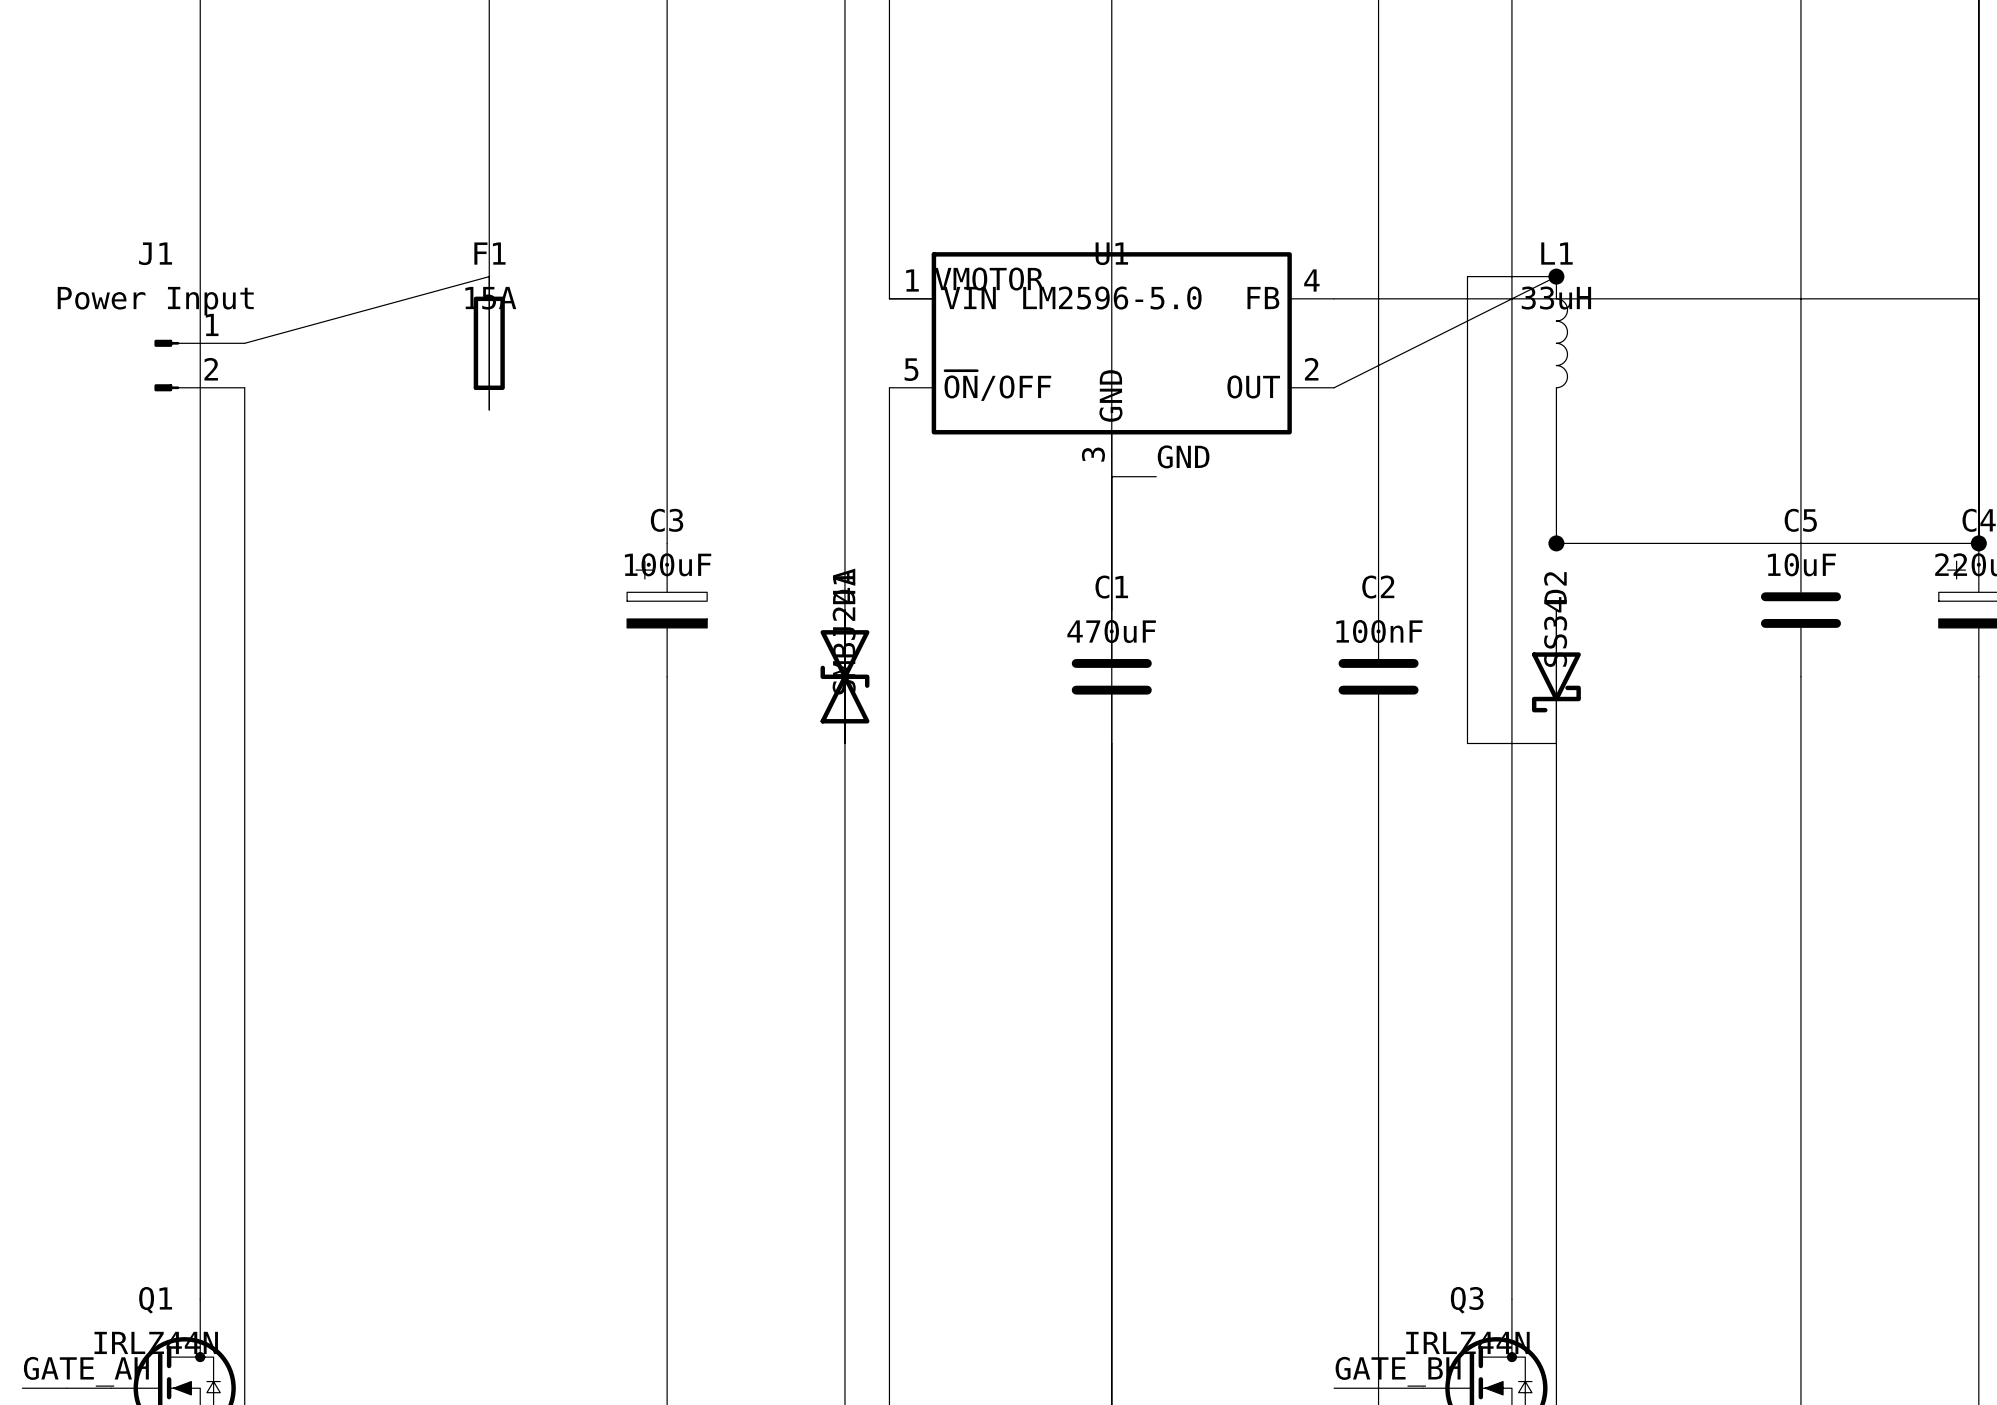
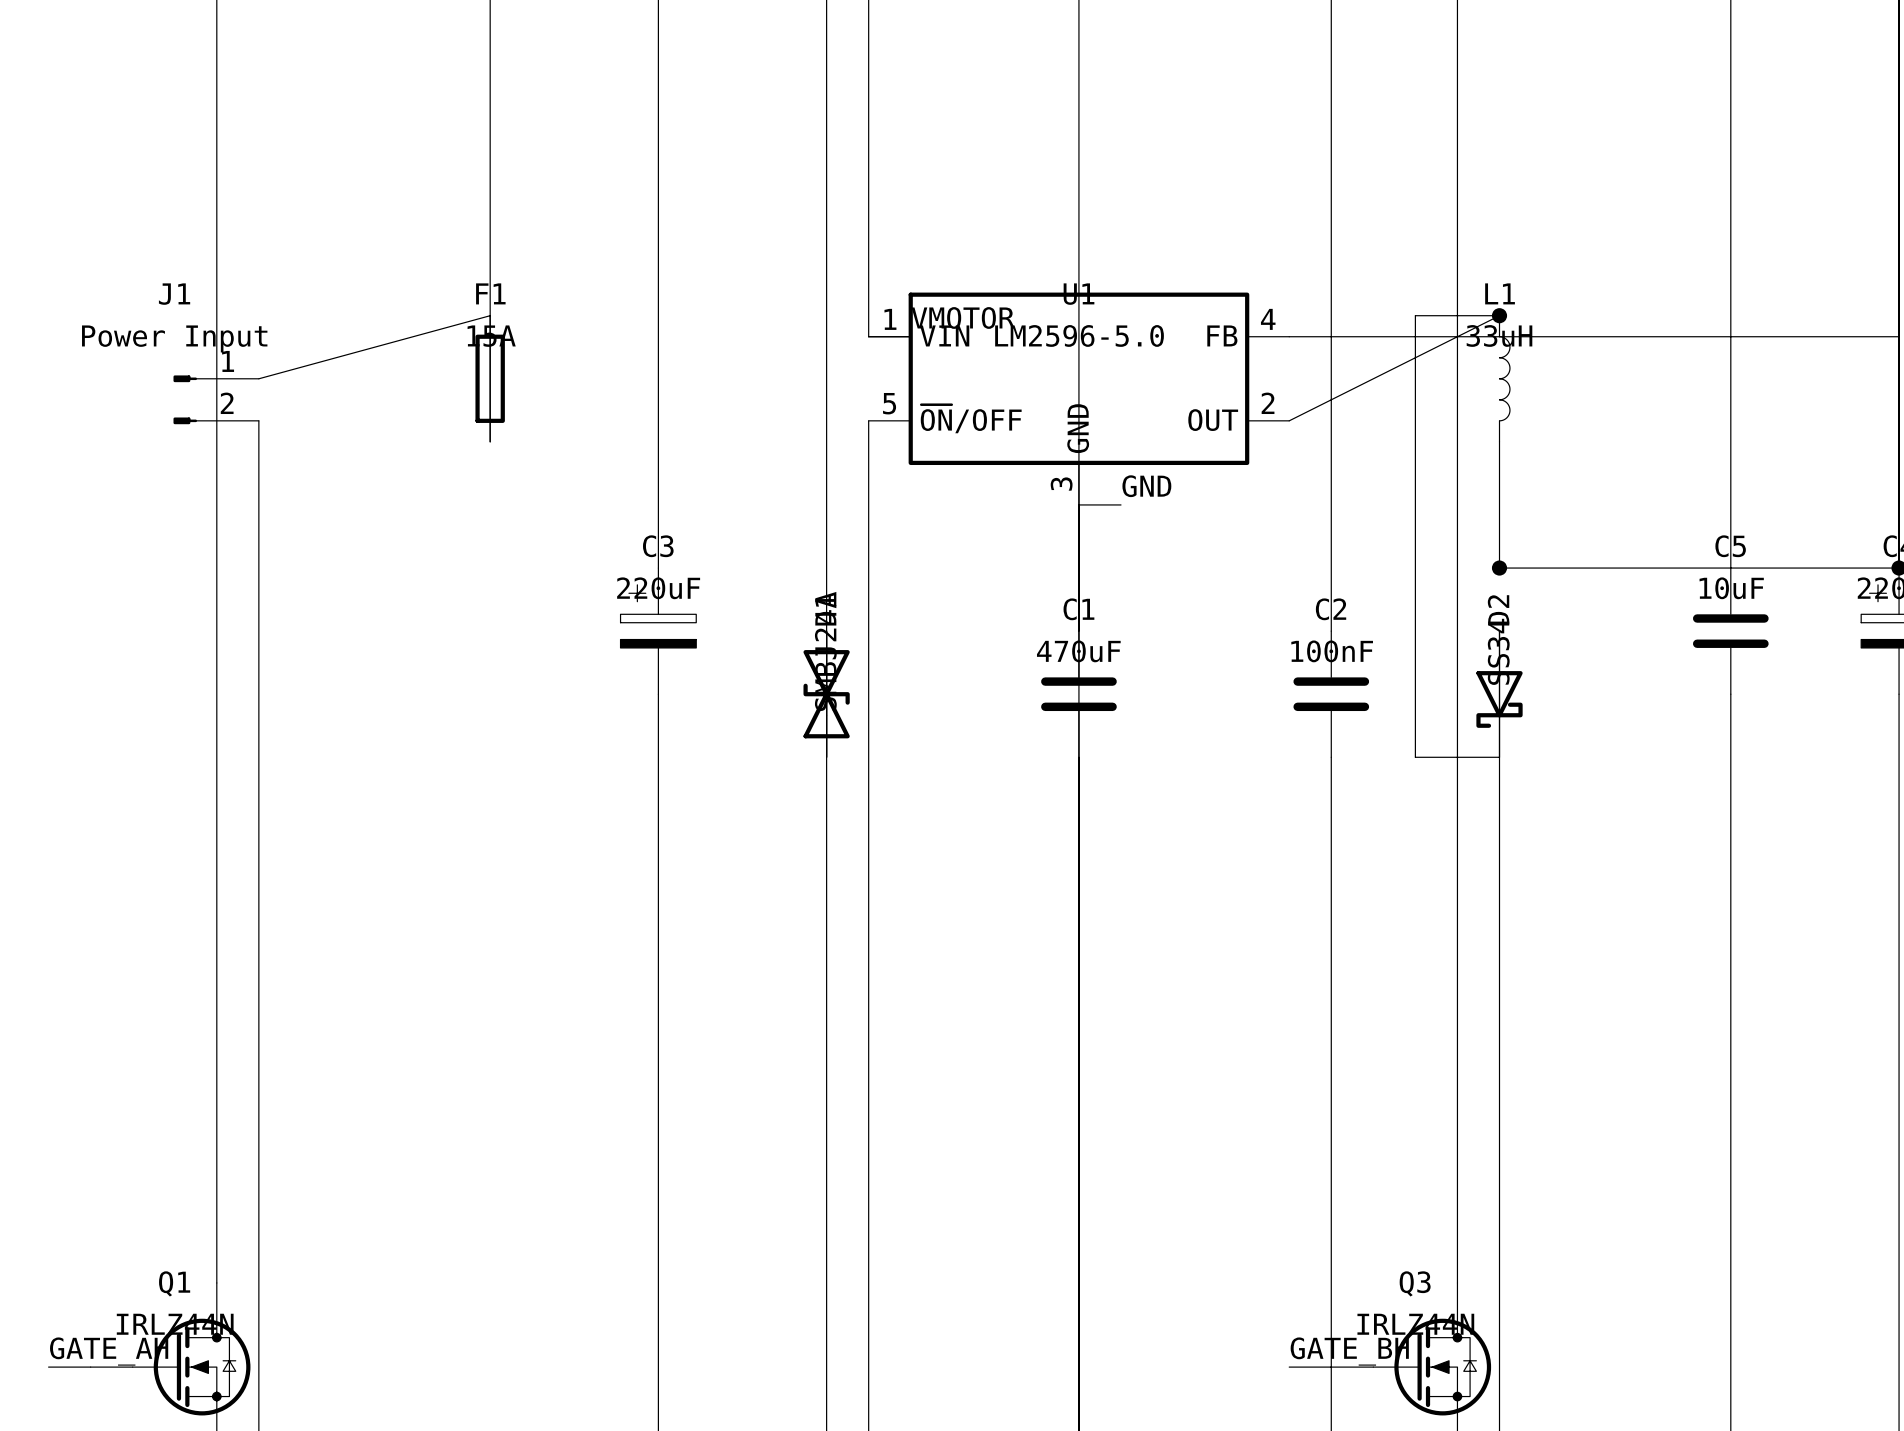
C3 value: 100uF (668, 564) -> 220uF (658, 588)

